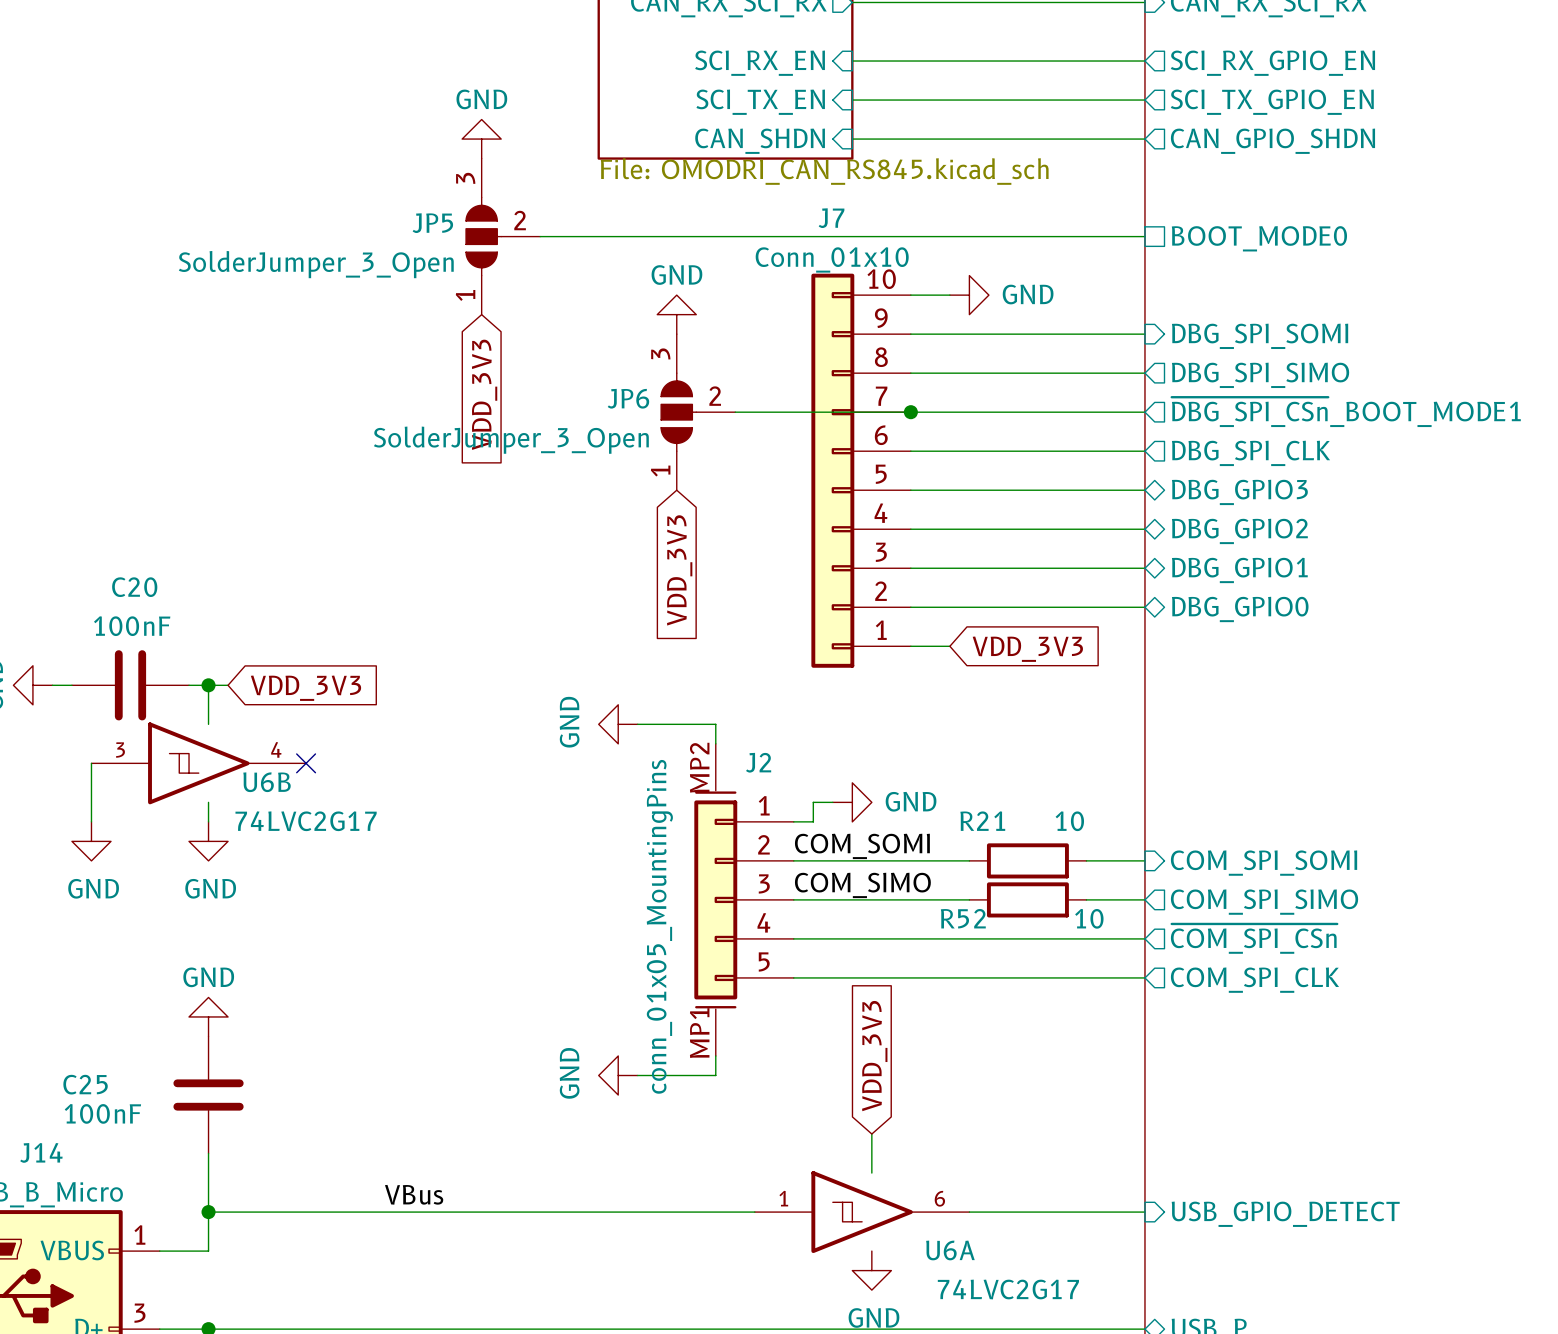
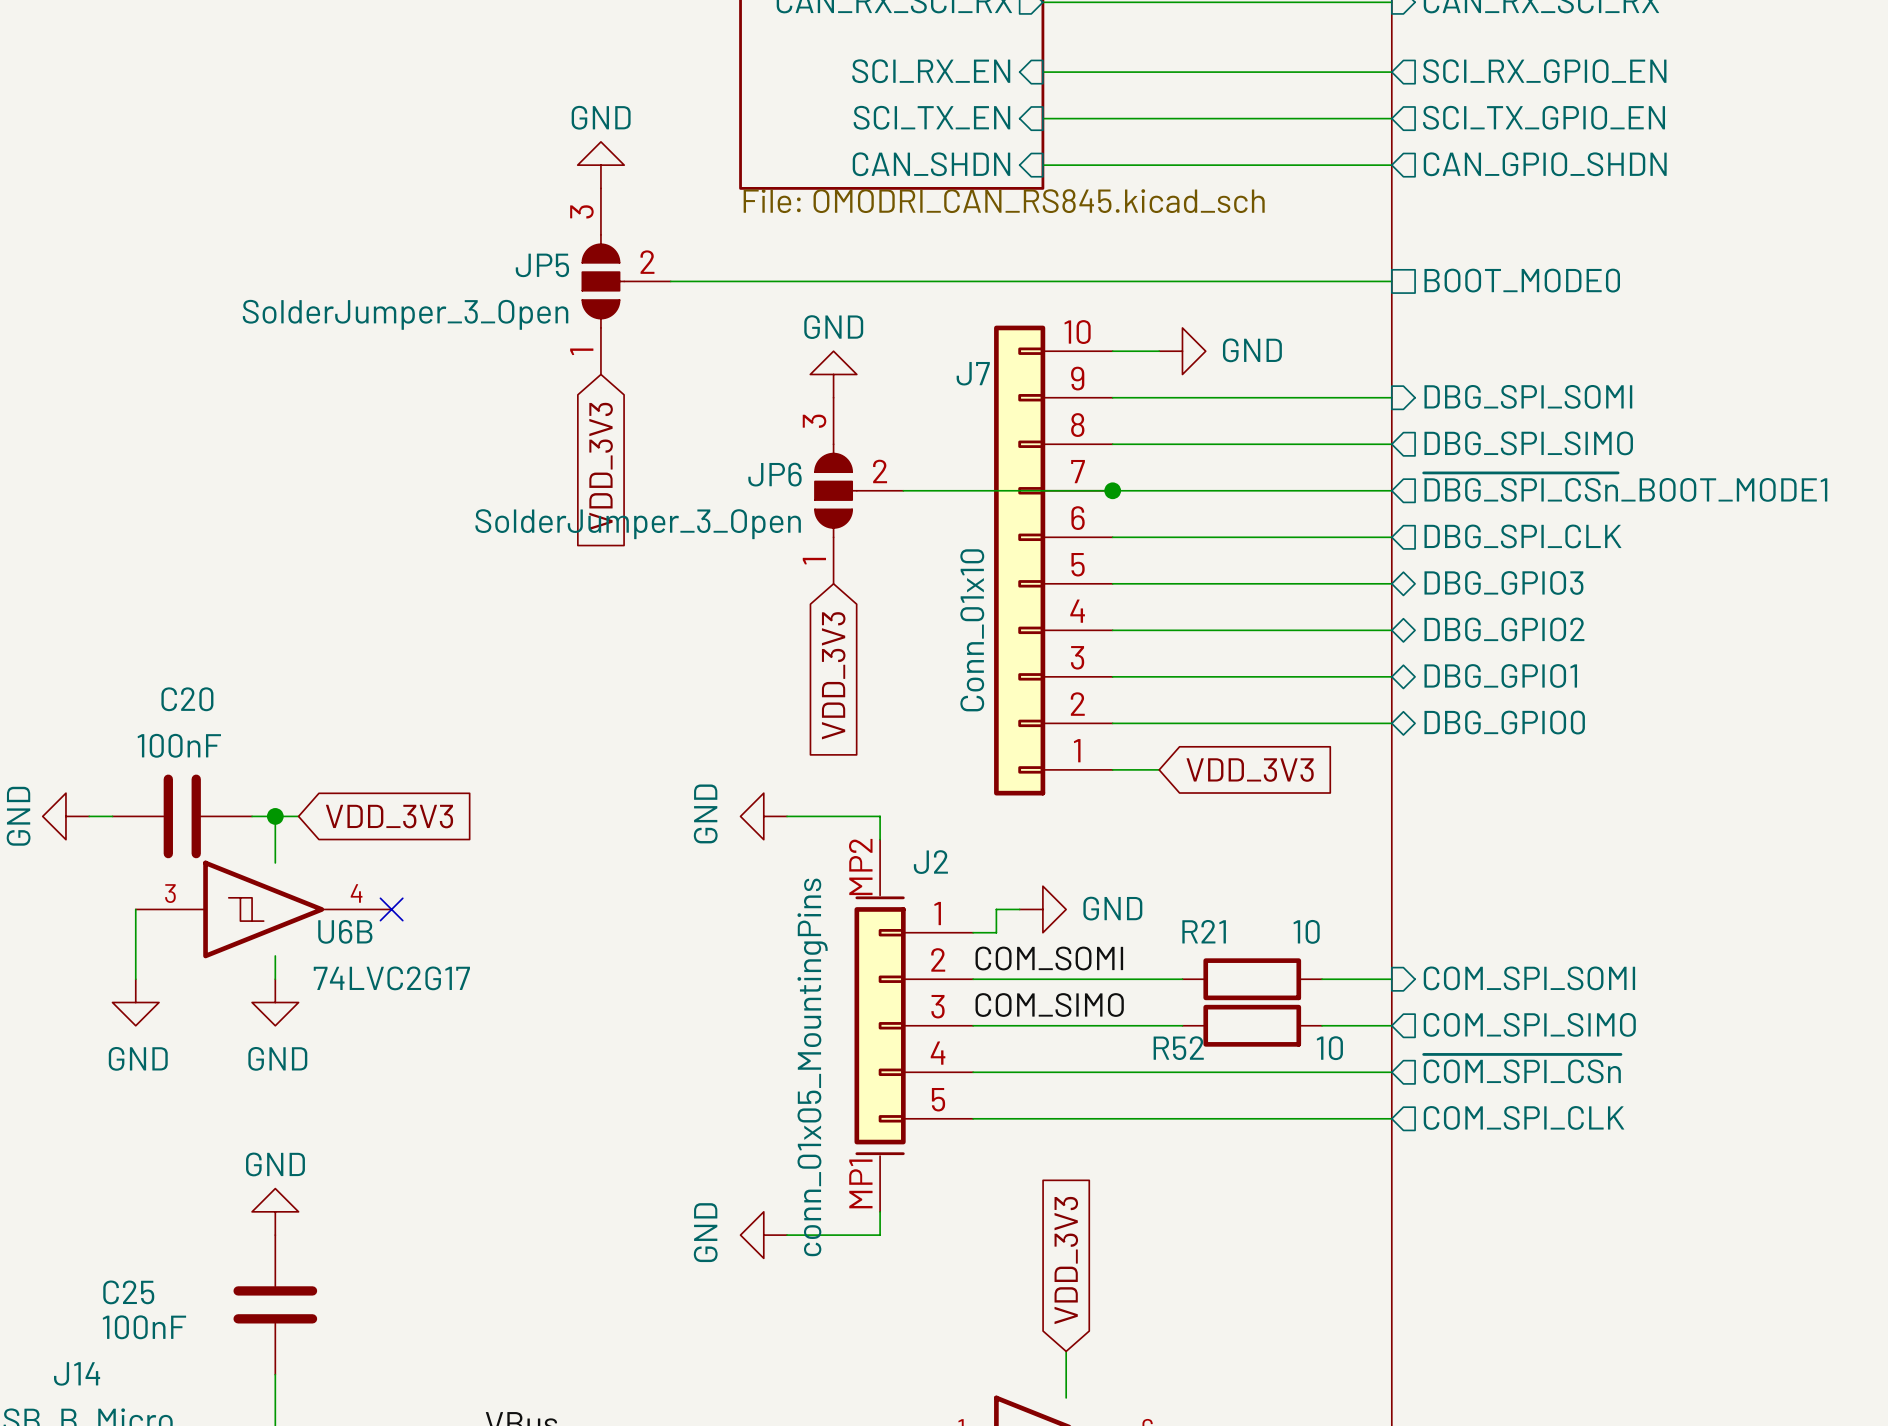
J7 name position: J7 (831, 218) -> J7 (973, 373)
J7 value rotation: 0° (832, 259) -> 90° counterclockwise (972, 630)
J7 value position: Conn_01x10 (832, 259) -> Conn_01x10 (972, 630)
power symbol position: GND (618, 724) -> GND (763, 816)
wire: (637, 724) (715, 724) (715, 743) -> (787, 816) (880, 816) (880, 839)
wire: none -> (1019, 909) (996, 909) (996, 932) (973, 932)
wire: (832, 802) (813, 802) (813, 821) -> (1182, 979) (996, 979)
power symbol position: GND (852, 802) -> GND (1042, 909)
label: none -> COM_SOMI (1049, 958)
R21 name: R21 (982, 821) -> R52 (1178, 1048)
R21: none -> 10 (1252, 979)
R21 value position: 10 (1069, 821) -> 10 (1329, 1048)
wire: none -> (1322, 979) (1391, 979)
sheet pin: none -> COM_SPI_SOMI (1529, 978)
label: COM_SOMI (862, 846) -> COM_SIMO (1049, 1005)
sheet pin shape: input (1264, 863) -> output (1529, 1024)
sheet pin: COM_SPI_SOMI (1264, 863) -> COM_SPI_SIMO (1529, 1024)
label: COM_SIMO (862, 885) -> none
J2 position: (744, 899) -> (913, 1025)
wire: none -> (1182, 1072) (1322, 1072)
R52: 10 (1027, 899) -> none
sheet pin: COM_SPI_SIMO (1264, 902) -> ~{COM_SPI_CSn} (1522, 1068)
sheet pin: ~{COM_SPI_CSn} (1254, 938) -> COM_SPI_CLK (1524, 1117)
wire: (793, 977) (1144, 977) -> none
sheet pin: COM_SPI_CLK (1254, 980) -> none
wire: (715, 1055) (715, 1075) (637, 1075) -> (880, 1211) (880, 1235) (787, 1235)
power symbol position: GND (618, 1075) -> GND (763, 1235)

